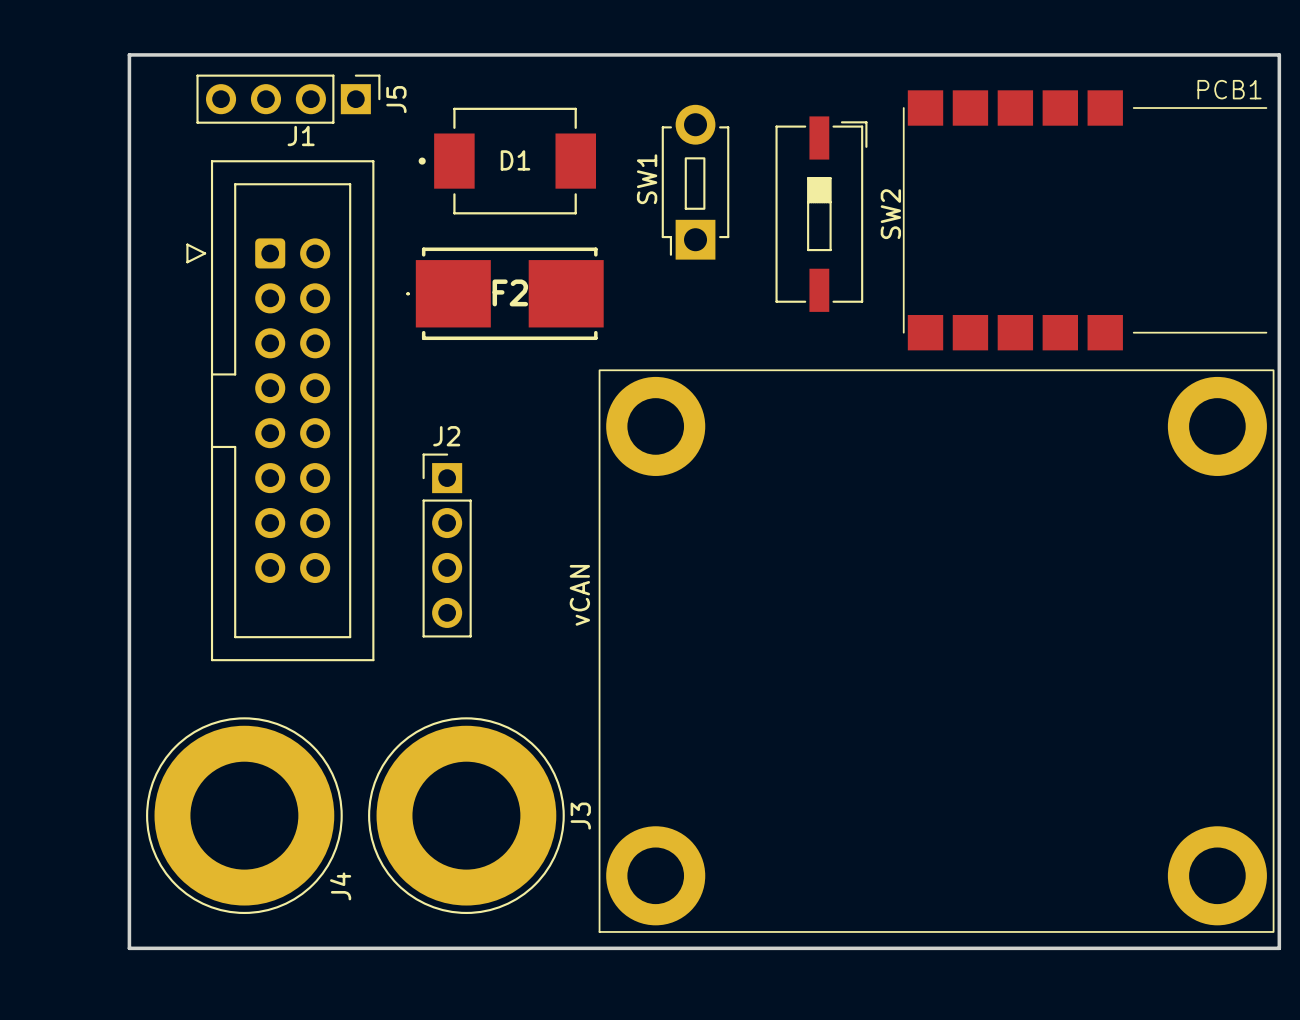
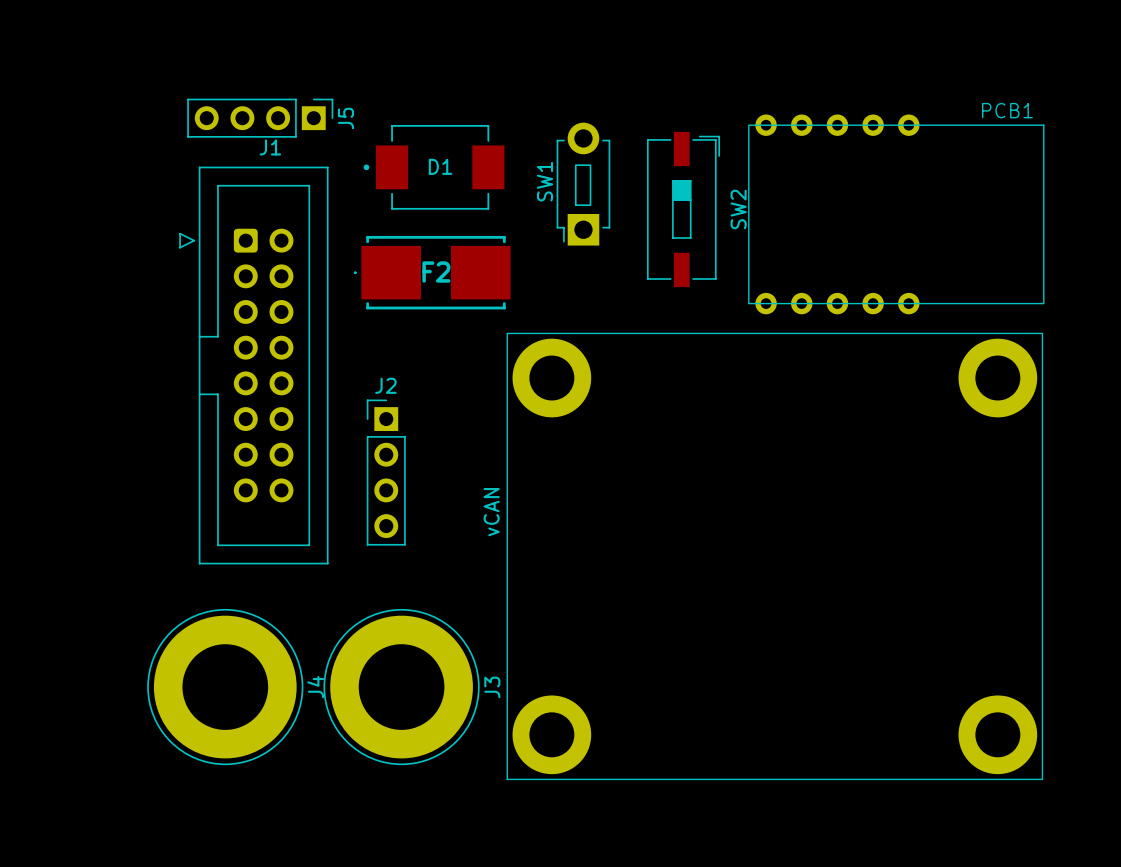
board edge: (129, 54) (1279, 54) (1279, 948) (129, 948) (129, 54) -> none
PCB1 footprint: [902, 90, 1268, 351] -> [748, 114, 1045, 315]
J4 name position: J4 (340, 886) -> J4 (315, 687)

